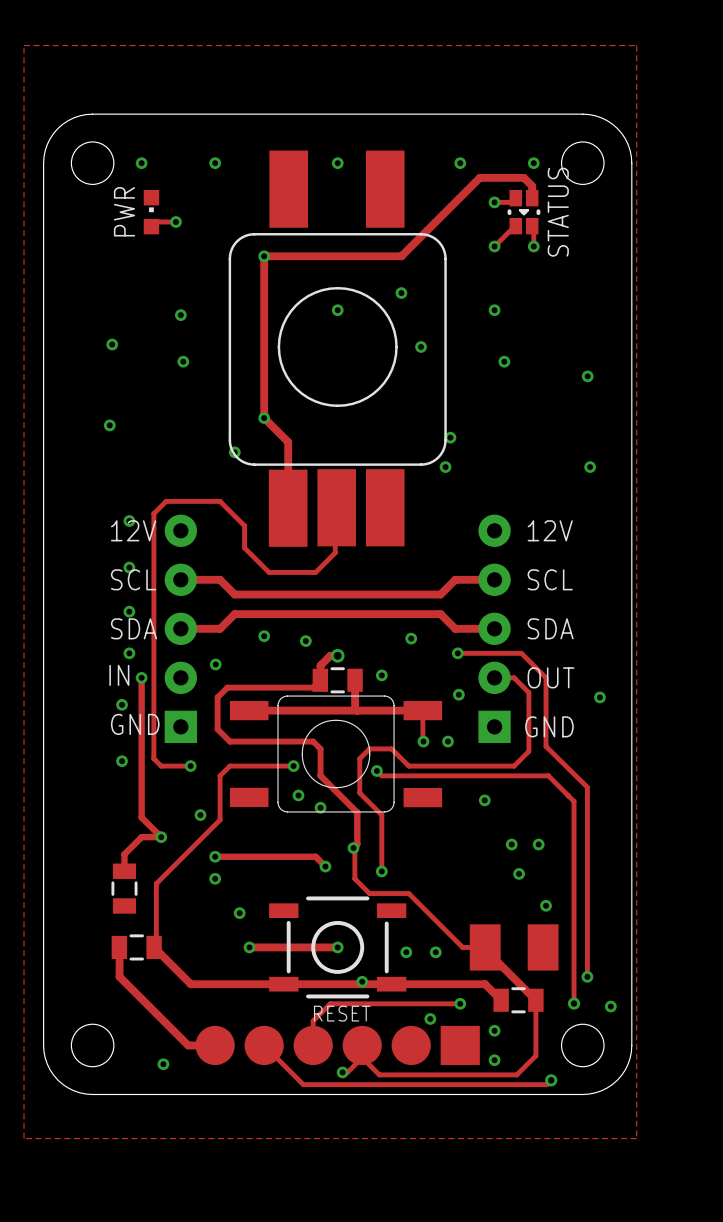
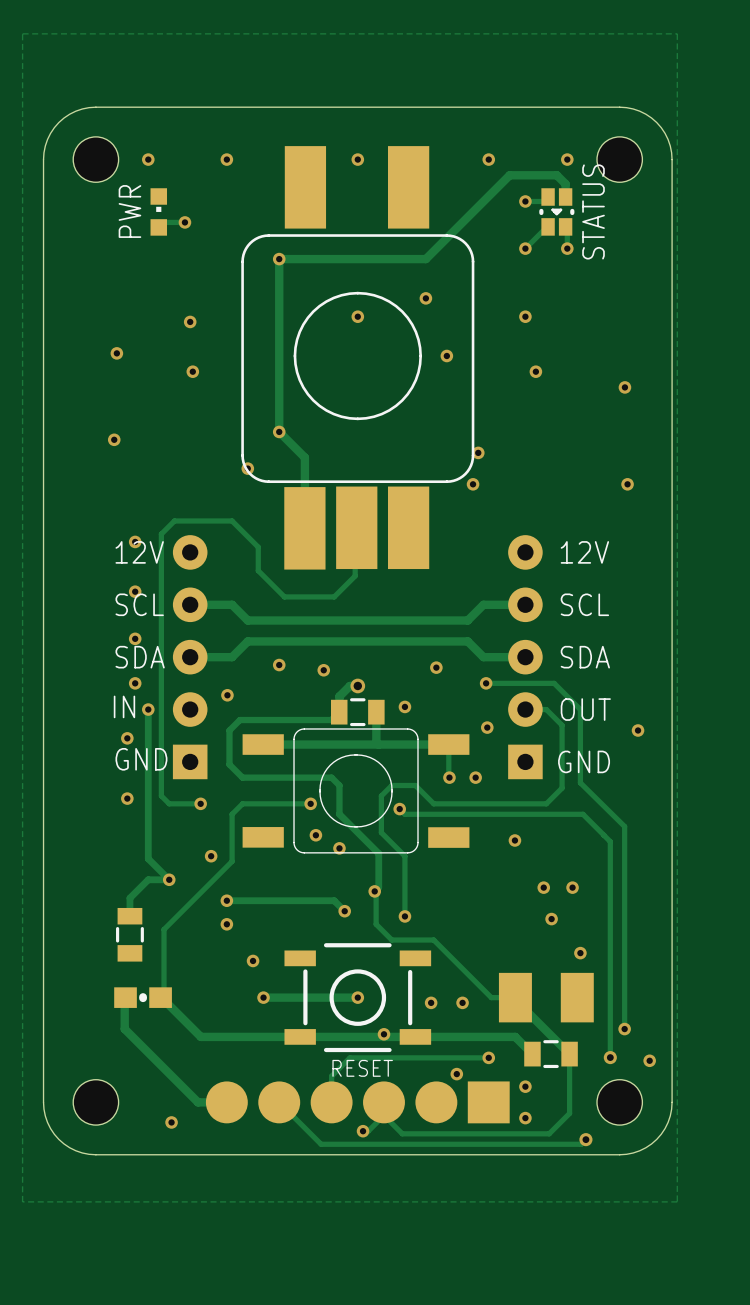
part footprint: [111, 934, 162, 961] -> [114, 987, 172, 1008]

